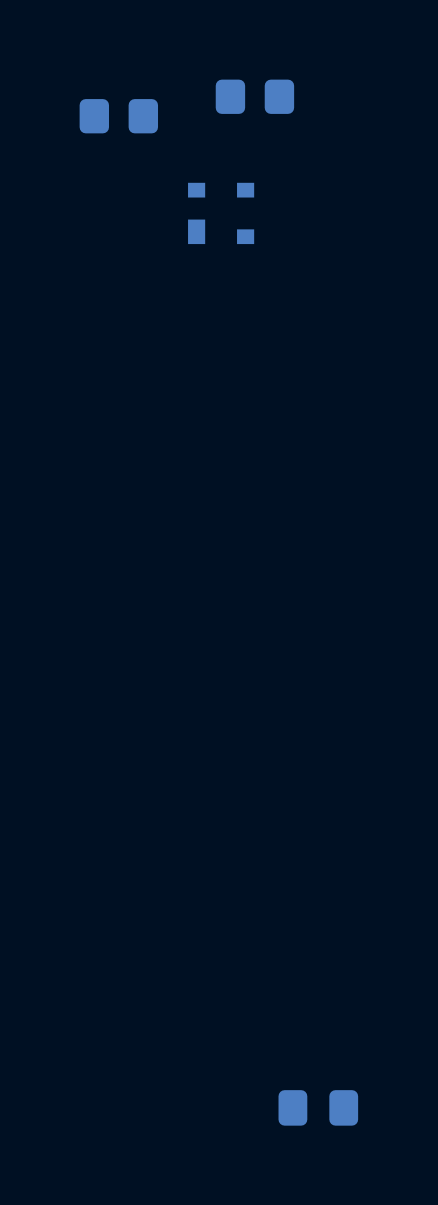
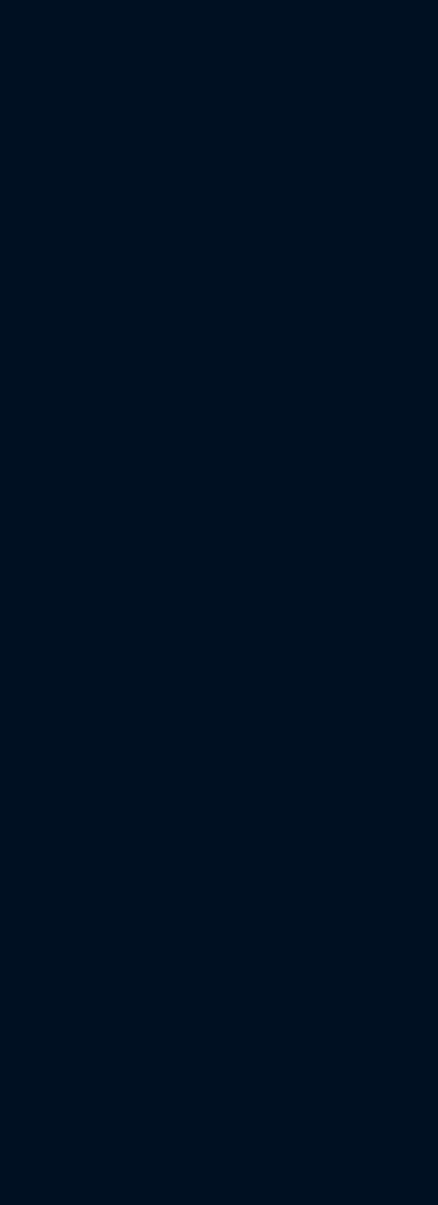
part: (254, 96) -> none
part: (118, 116) -> none
part: (221, 213) -> none
part: (318, 1107) -> none

